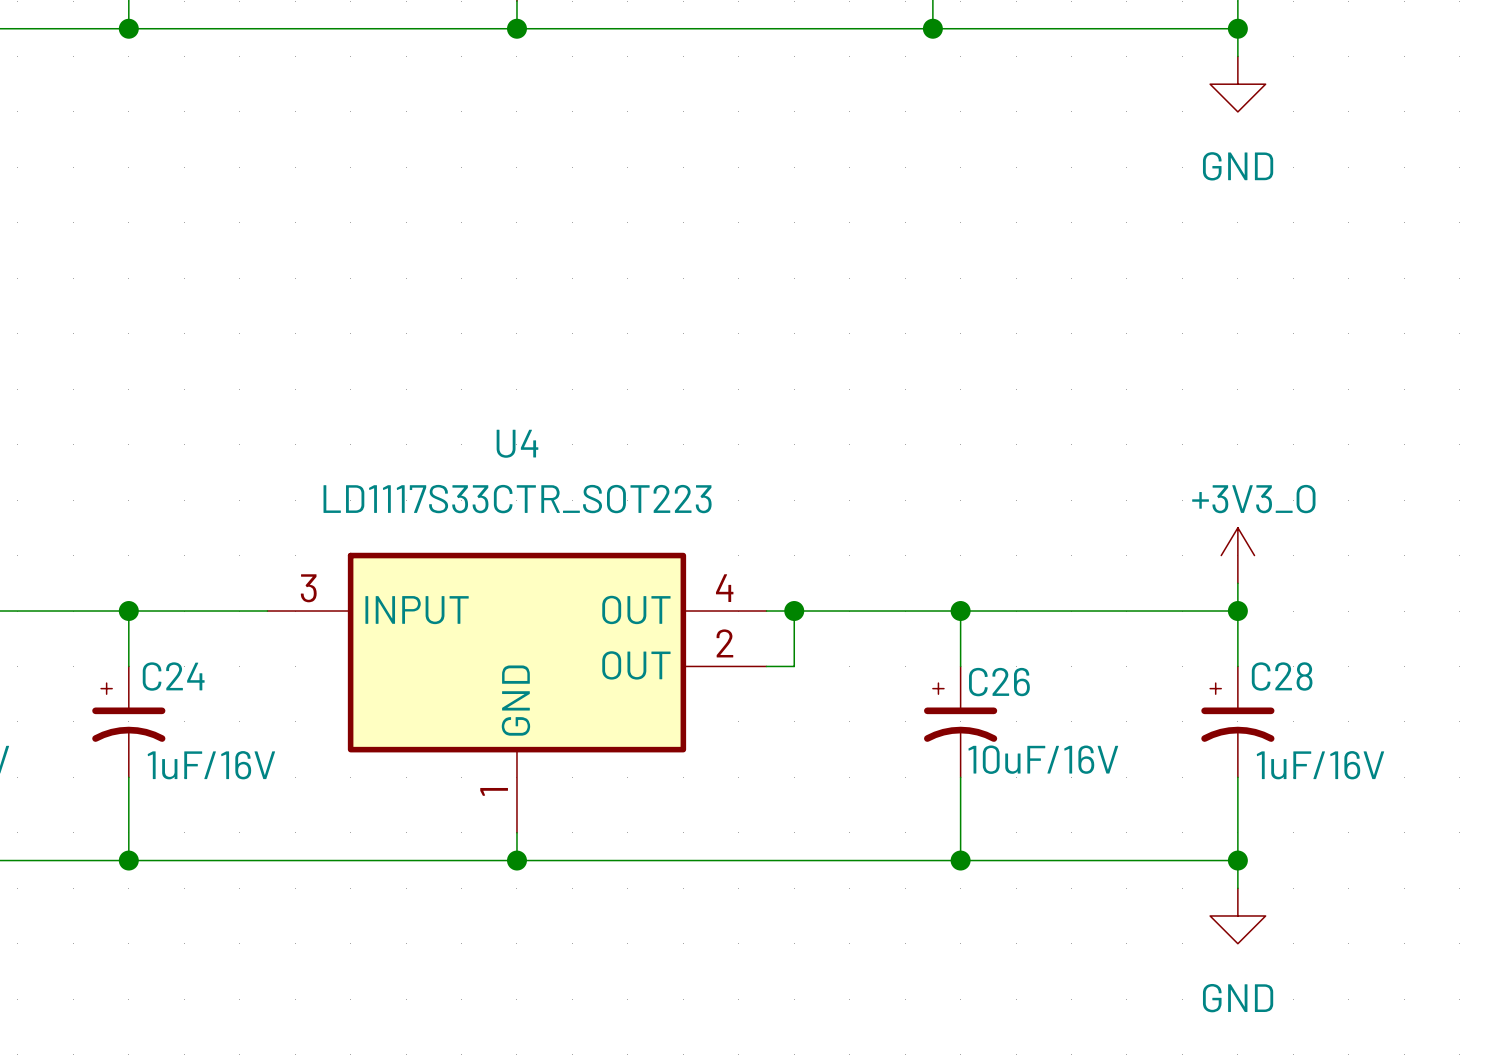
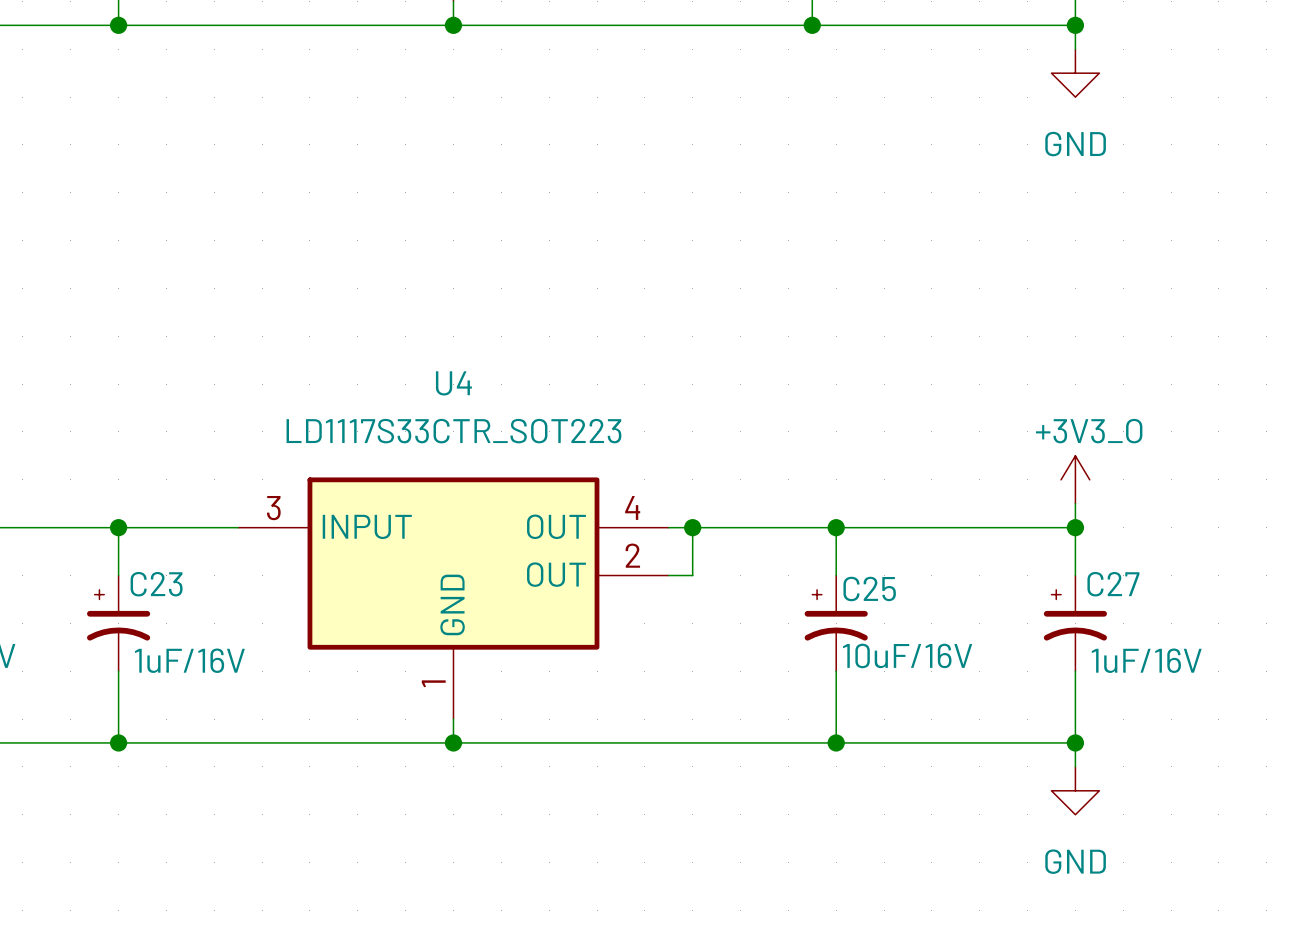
C24 name: C24 (173, 676) -> C23 (156, 584)
C28 name: C28 (1282, 676) -> C27 (1113, 584)
C26 name: C26 (999, 682) -> C25 (869, 588)

